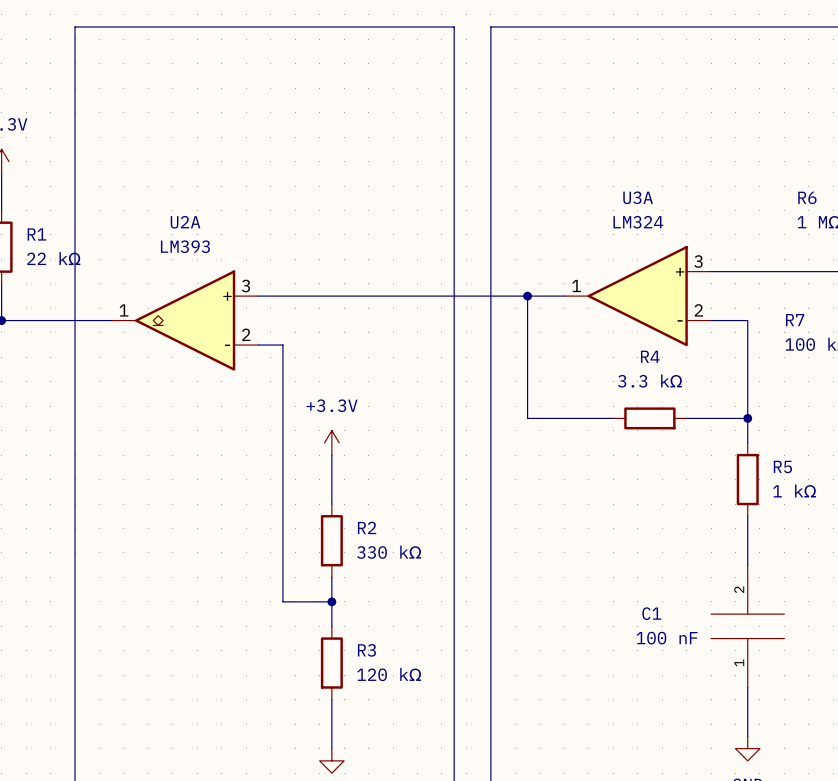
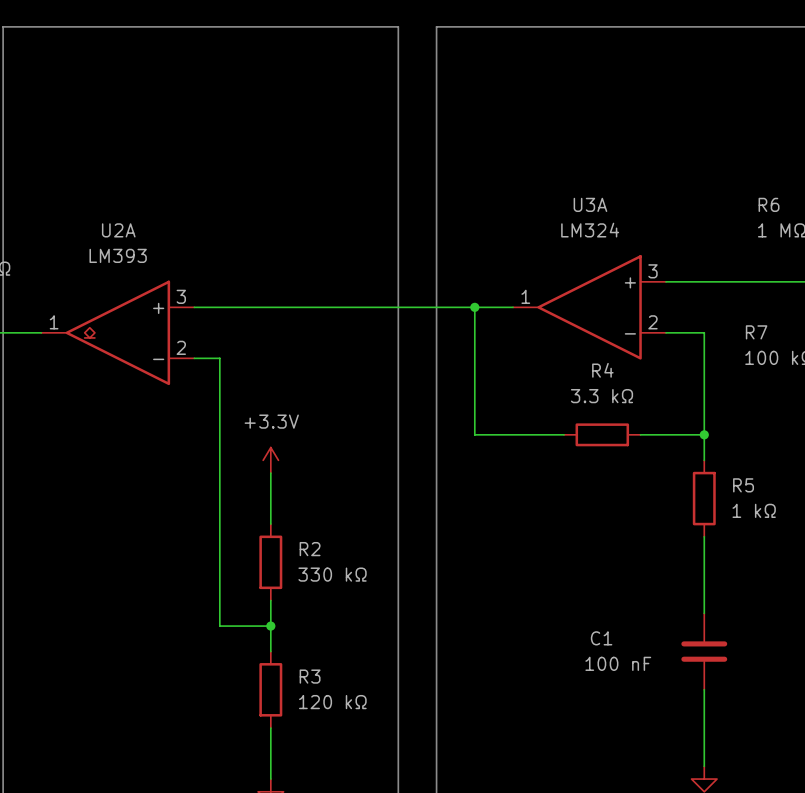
C1 symbol: [711, 565, 785, 688] -> [681, 613, 728, 690]

